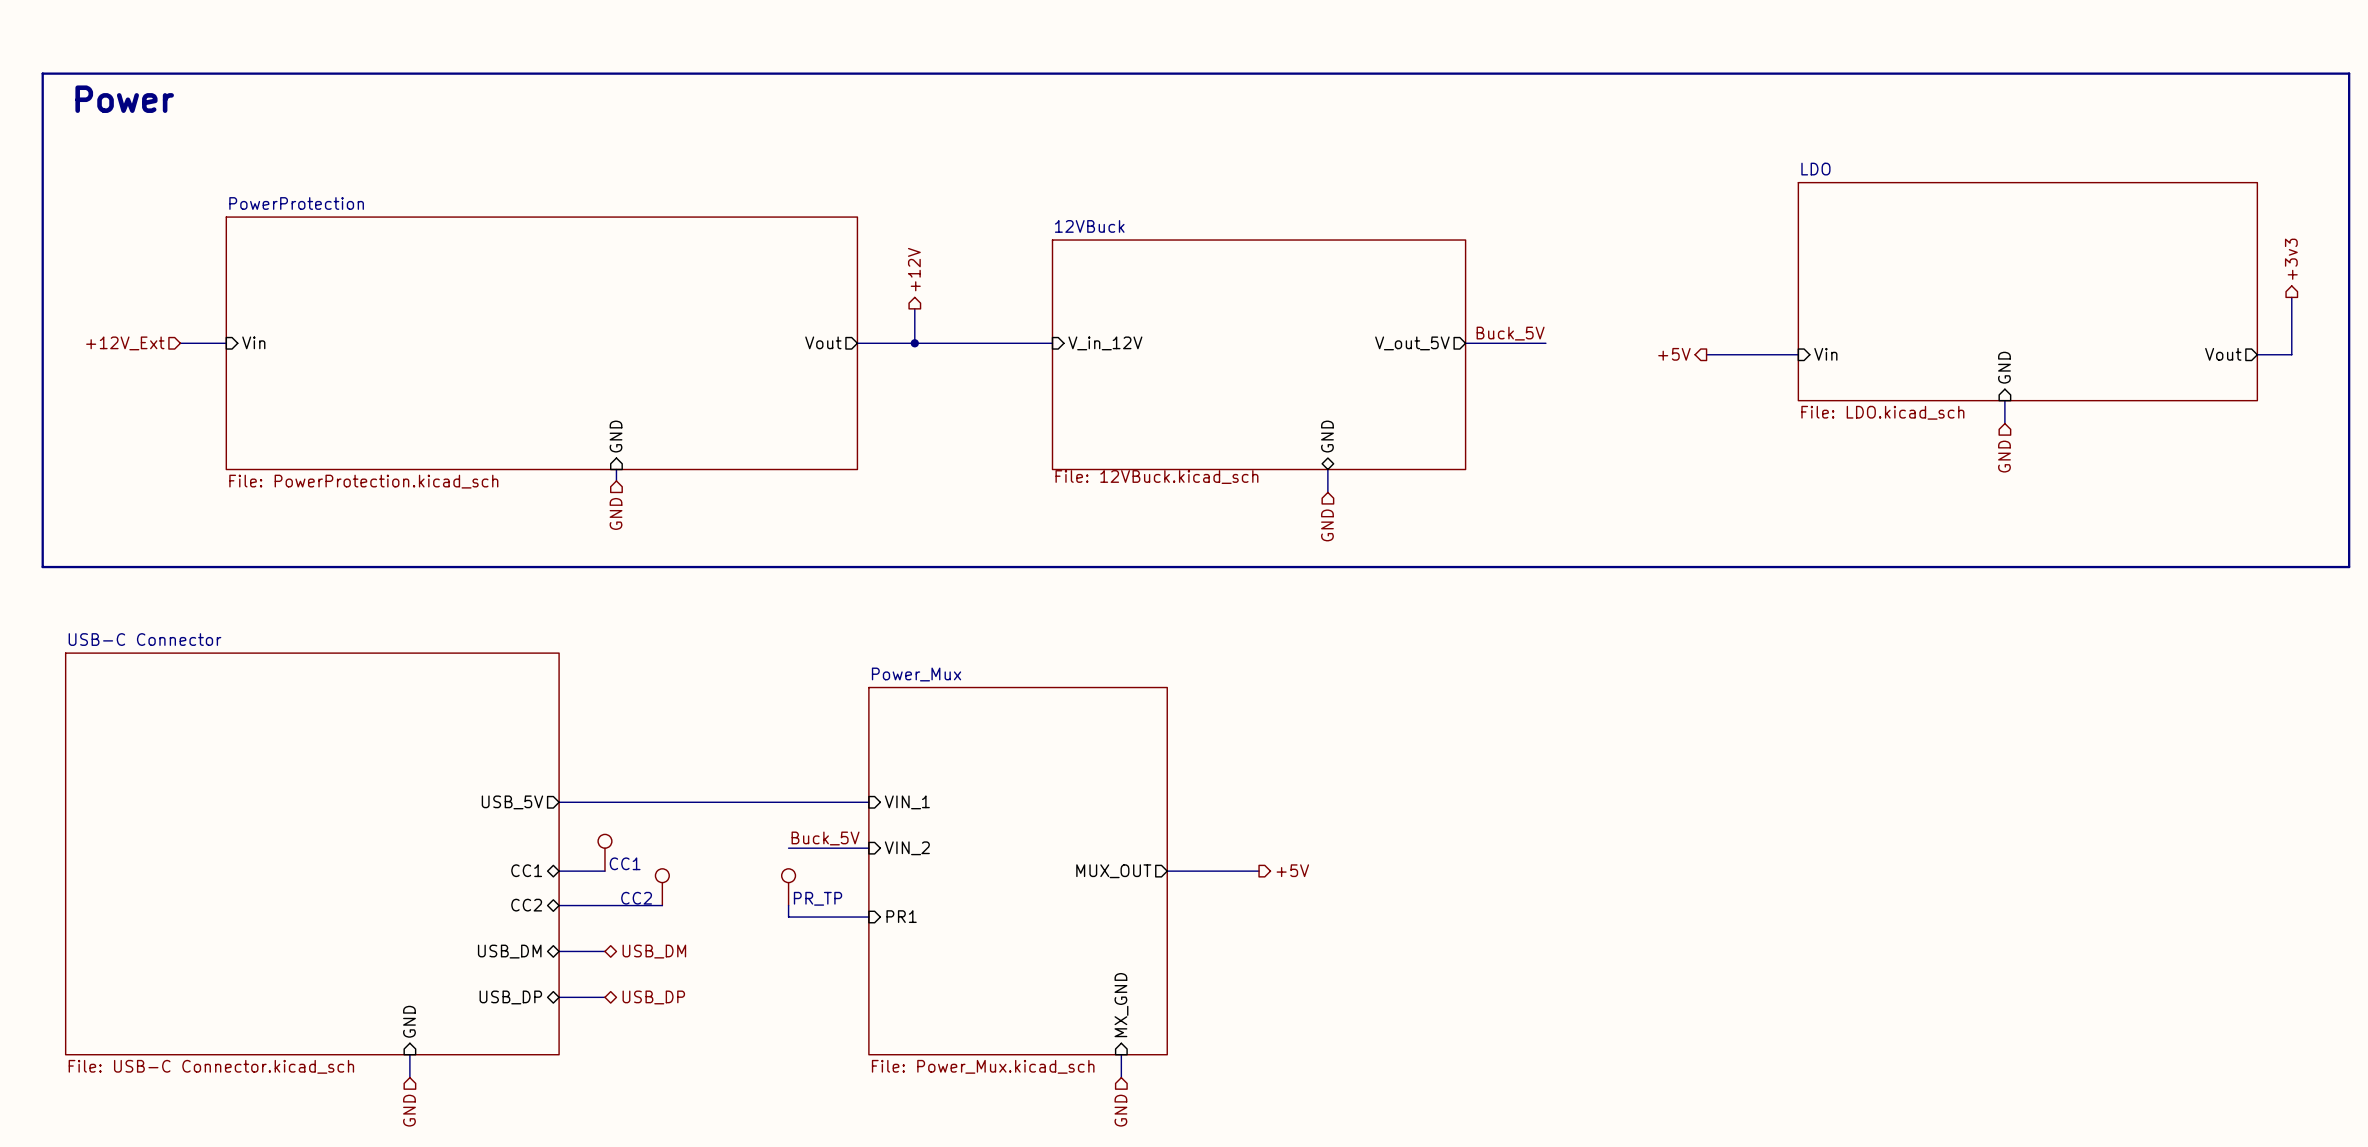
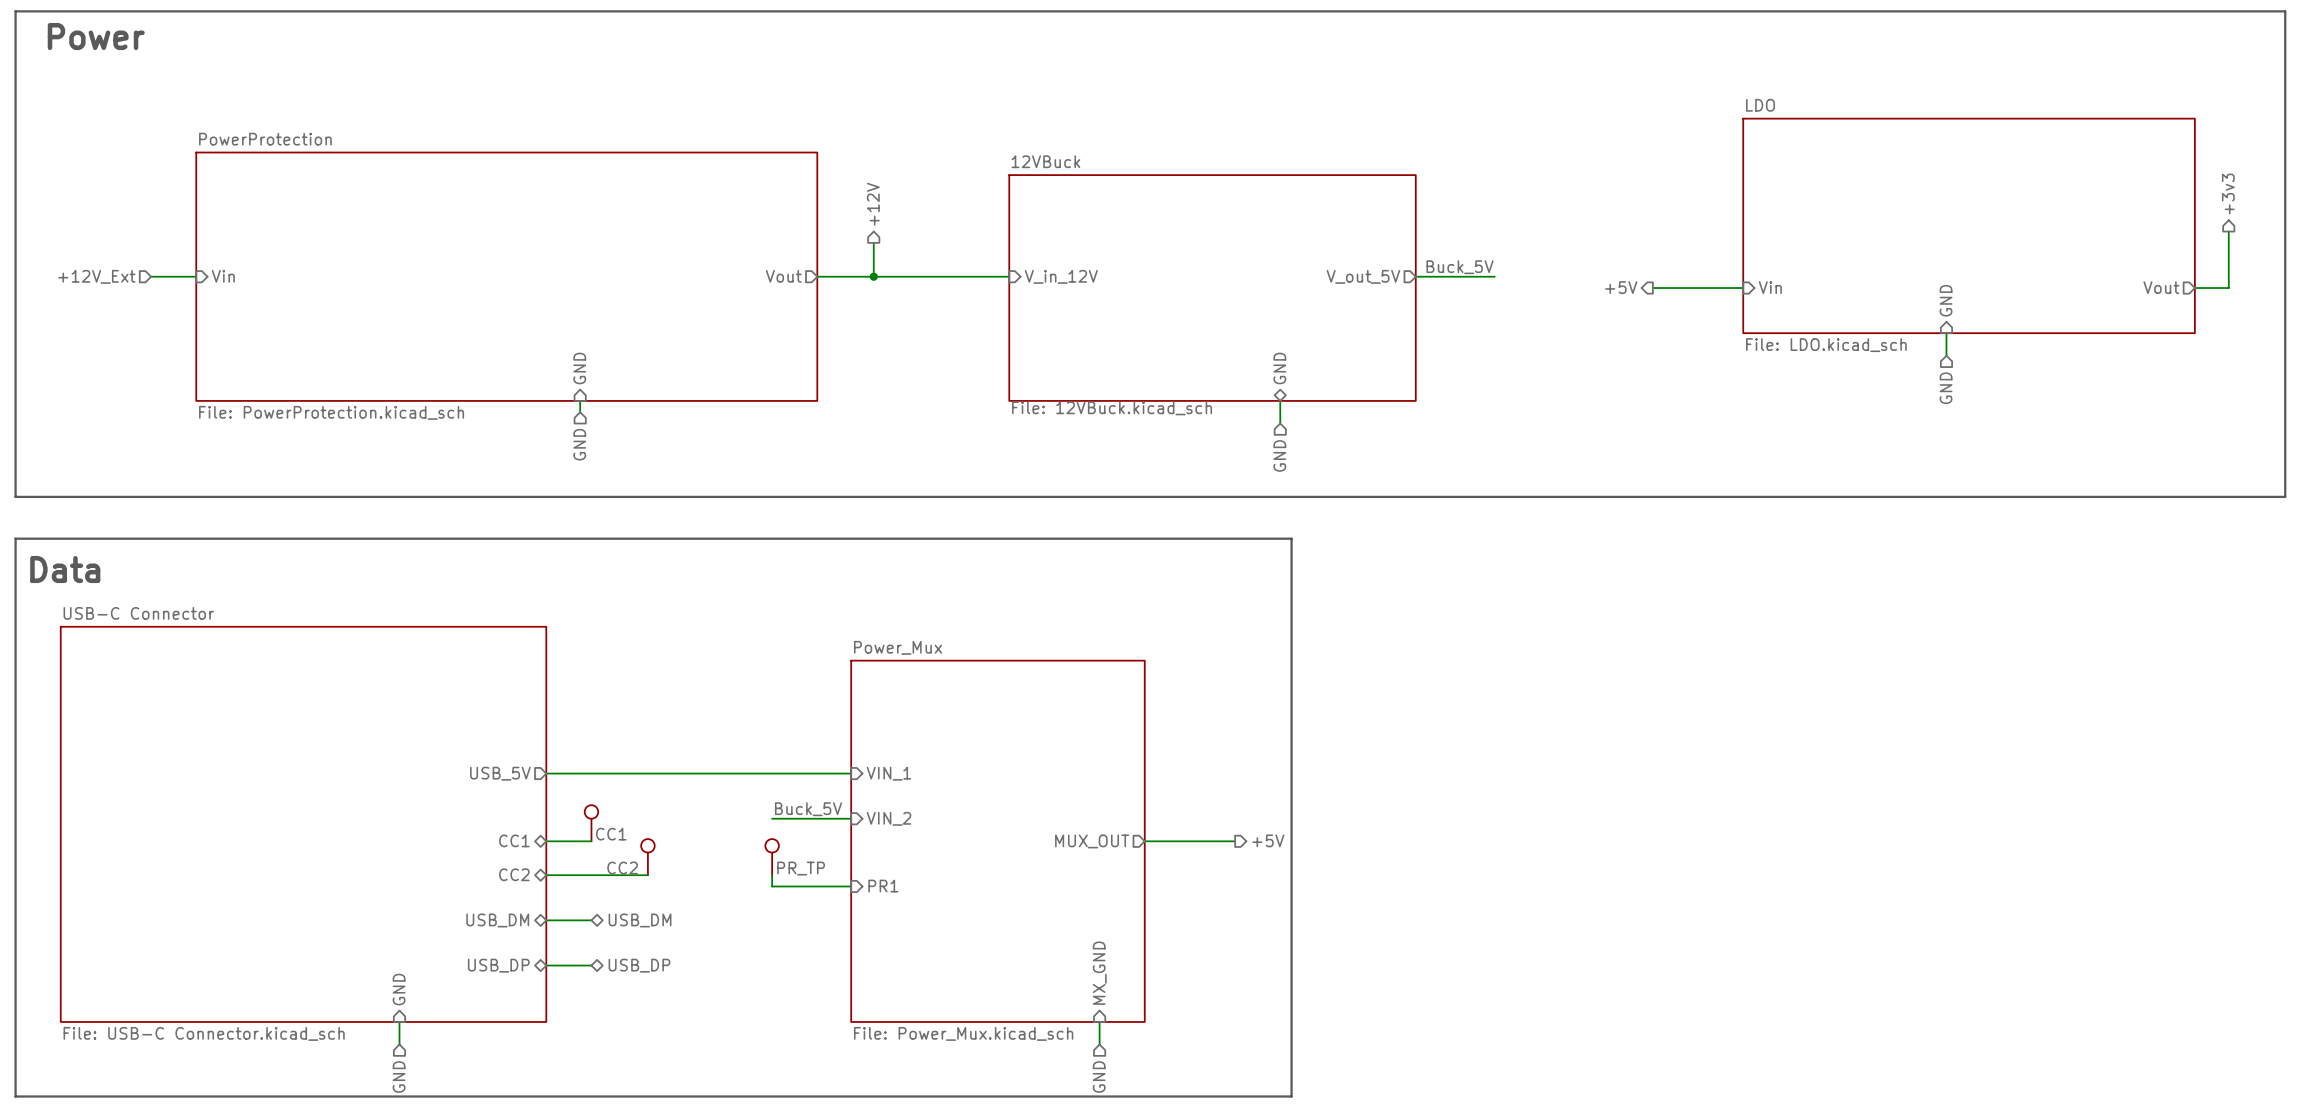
line: (42, 73) (2349, 73) (2349, 567) (42, 567) (42, 73) -> (15, 11) (2285, 11) (2285, 496) (15, 496) (15, 11)
text position: Power (124, 99) -> Power (96, 36)
hierarchical label position: +3v3 (2291, 259) -> +3v3 (2228, 194)
hierarchical label position: +12V (914, 269) -> +12V (873, 204)
sheet LDO position: (2027, 291) -> (1969, 225)
wire: (2291, 297) (2291, 354) (2257, 354) -> (2228, 231) (2228, 288) (2194, 288)
wire: (914, 308) (914, 343) -> (873, 242) (873, 276)
label position: Buck_5V (1510, 333) -> Buck_5V (1460, 267)
sheet pin position: Vin (253, 342) -> Vin (223, 276)
sheet pin position: Vout (823, 342) -> Vout (783, 276)
hierarchical label position: +12V_Ext (125, 343) -> +12V_Ext (96, 276)
wire: (180, 343) (226, 343) -> (151, 276) (196, 276)
sheet PowerProtection position: (541, 343) -> (506, 276)
wire: (857, 343) (1052, 343) -> (817, 276) (1009, 276)
junction position: (914, 343) -> (873, 276)
sheet pin position: V_in_12V (1105, 343) -> V_in_12V (1061, 276)
sheet pin position: V_out_5V (1412, 343) -> V_out_5V (1363, 276)
wire: (1465, 343) (1545, 343) -> (1415, 276) (1494, 276)
sheet 12VBuck position: (1259, 354) -> (1212, 288)
hierarchical label position: +5V (1674, 354) -> +5V (1621, 287)
wire: (1706, 354) (1798, 354) -> (1652, 288) (1743, 288)
sheet pin position: Vin (1825, 354) -> Vin (1770, 287)
sheet pin position: Vout (2223, 354) -> Vout (2161, 287)
sheet pin position: GND (2004, 367) -> GND (1946, 300)
wire: (2004, 400) (2004, 423) -> (1946, 333) (1946, 355)
sheet pin position: GND (616, 436) -> GND (579, 368)
sheet pin position: GND (1327, 436) -> GND (1279, 368)
hierarchical label position: GND (2004, 456) -> GND (1946, 388)
wire: (616, 469) (616, 480) -> (580, 400) (580, 412)
wire: (1327, 469) (1327, 492) -> (1280, 400) (1280, 423)
hierarchical label position: GND (616, 513) -> GND (579, 444)
hierarchical label position: GND (1327, 525) -> GND (1279, 455)
line: none -> (15, 538) (1291, 538) (1291, 1096) (15, 1096) (15, 538)
text: none -> Data (65, 569)

